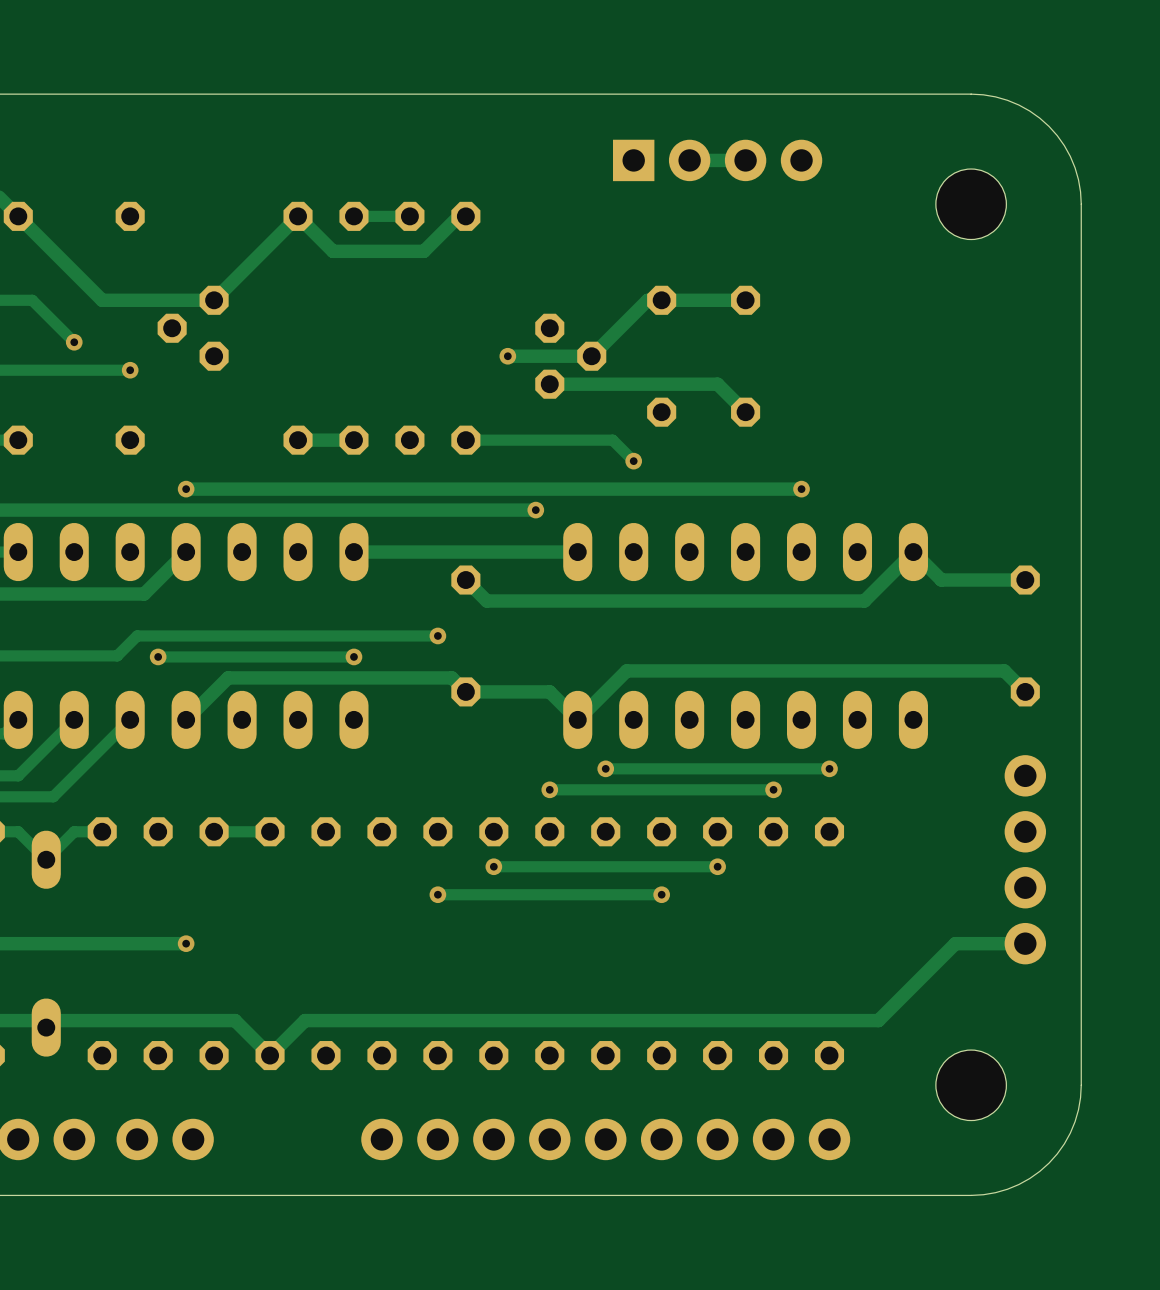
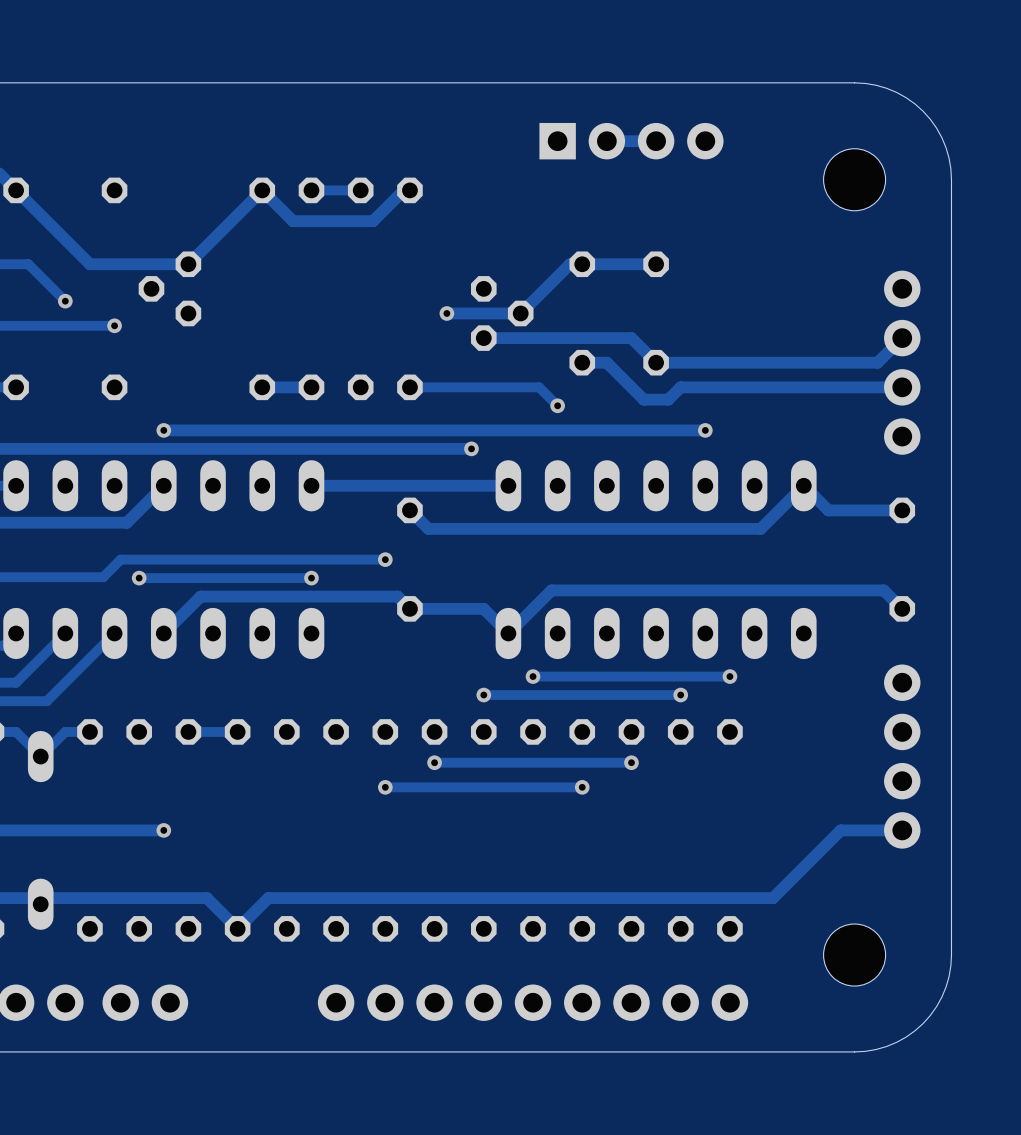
part: none -> (902, 313)
track: none -> (902, 338) (877, 362) (656, 362)
track: none -> (582, 362) (606, 362) (643, 399) (668, 399) (680, 387) (902, 387)
part: none -> (902, 411)

